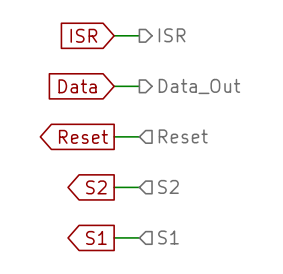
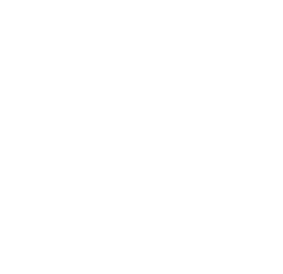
global label: ISR (83, 35) -> none
wire: (114, 35) (139, 35) -> none
hierarchical label: ISR (172, 35) -> none
global label: Data (77, 86) -> none
wire: (114, 86) (139, 86) -> none
hierarchical label: Data_Out (199, 86) -> none
global label: Reset (83, 136) -> none
wire: (114, 136) (139, 136) -> none
hierarchical label: Reset (183, 136) -> none
hierarchical label: S2 (168, 186) -> none
global label: S2 (96, 187) -> none
wire: (114, 187) (139, 187) -> none
global label: S1 (96, 237) -> none
wire: (114, 237) (139, 237) -> none
hierarchical label: S1 (168, 237) -> none

